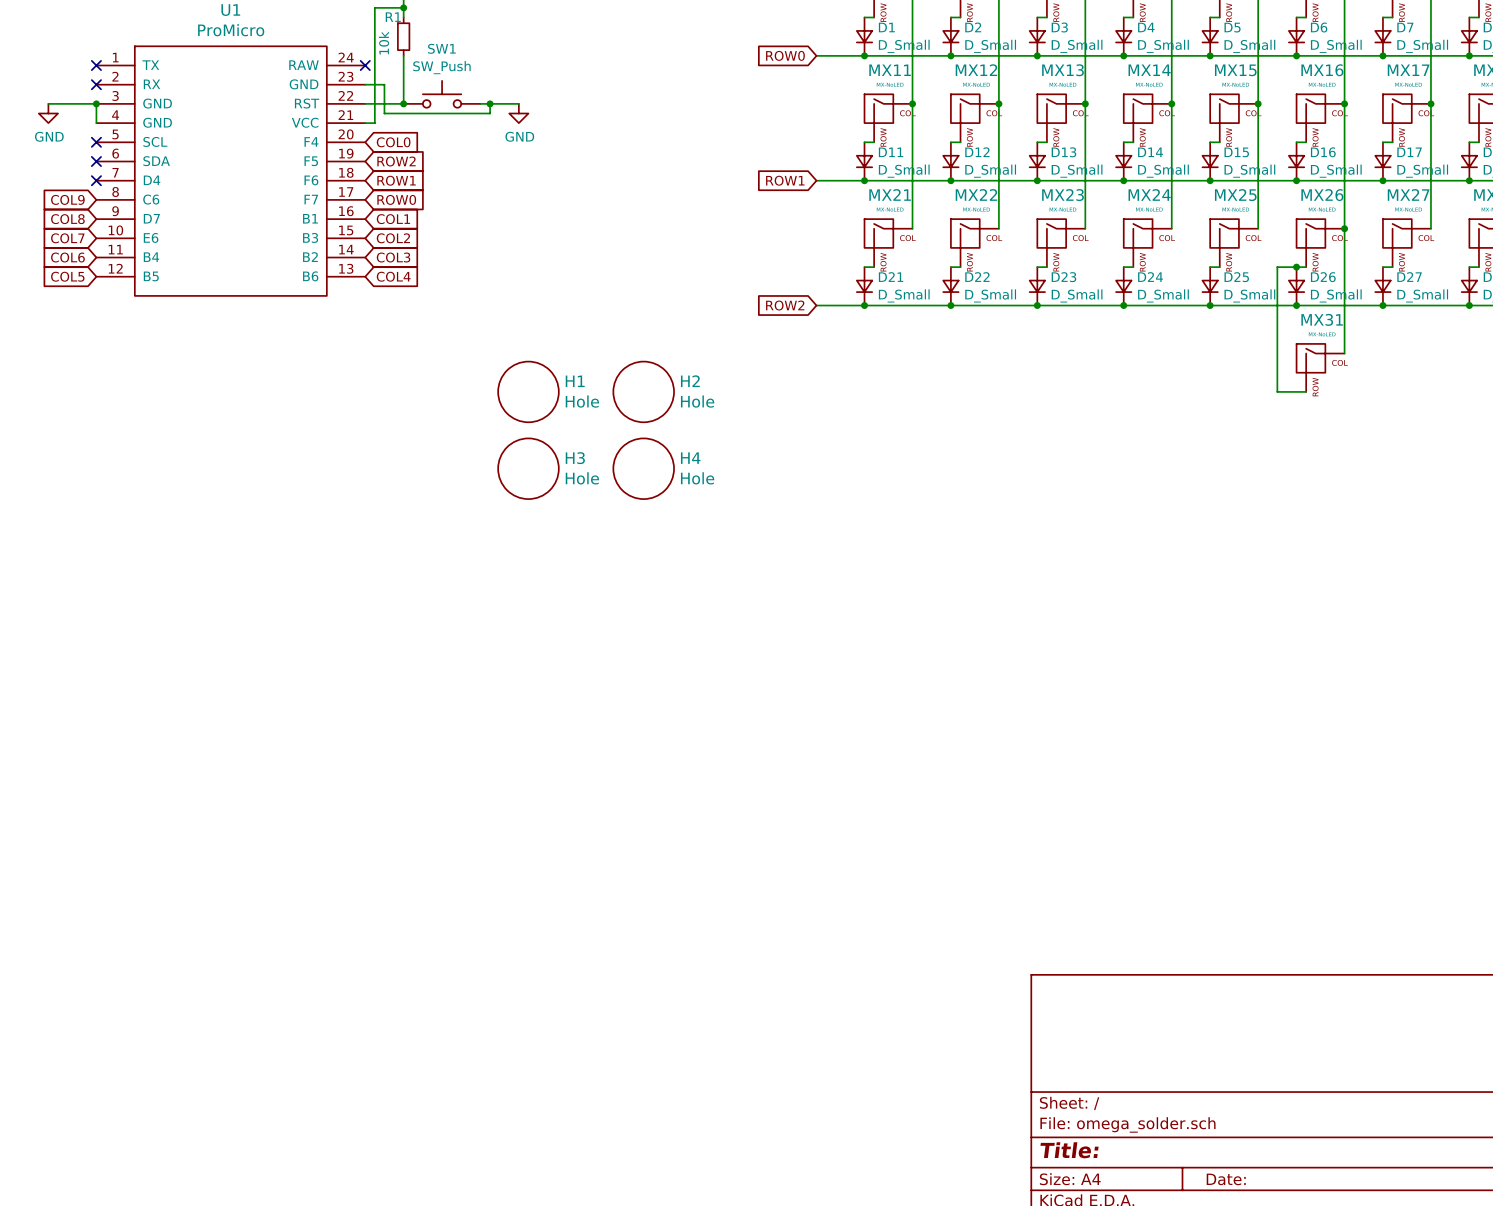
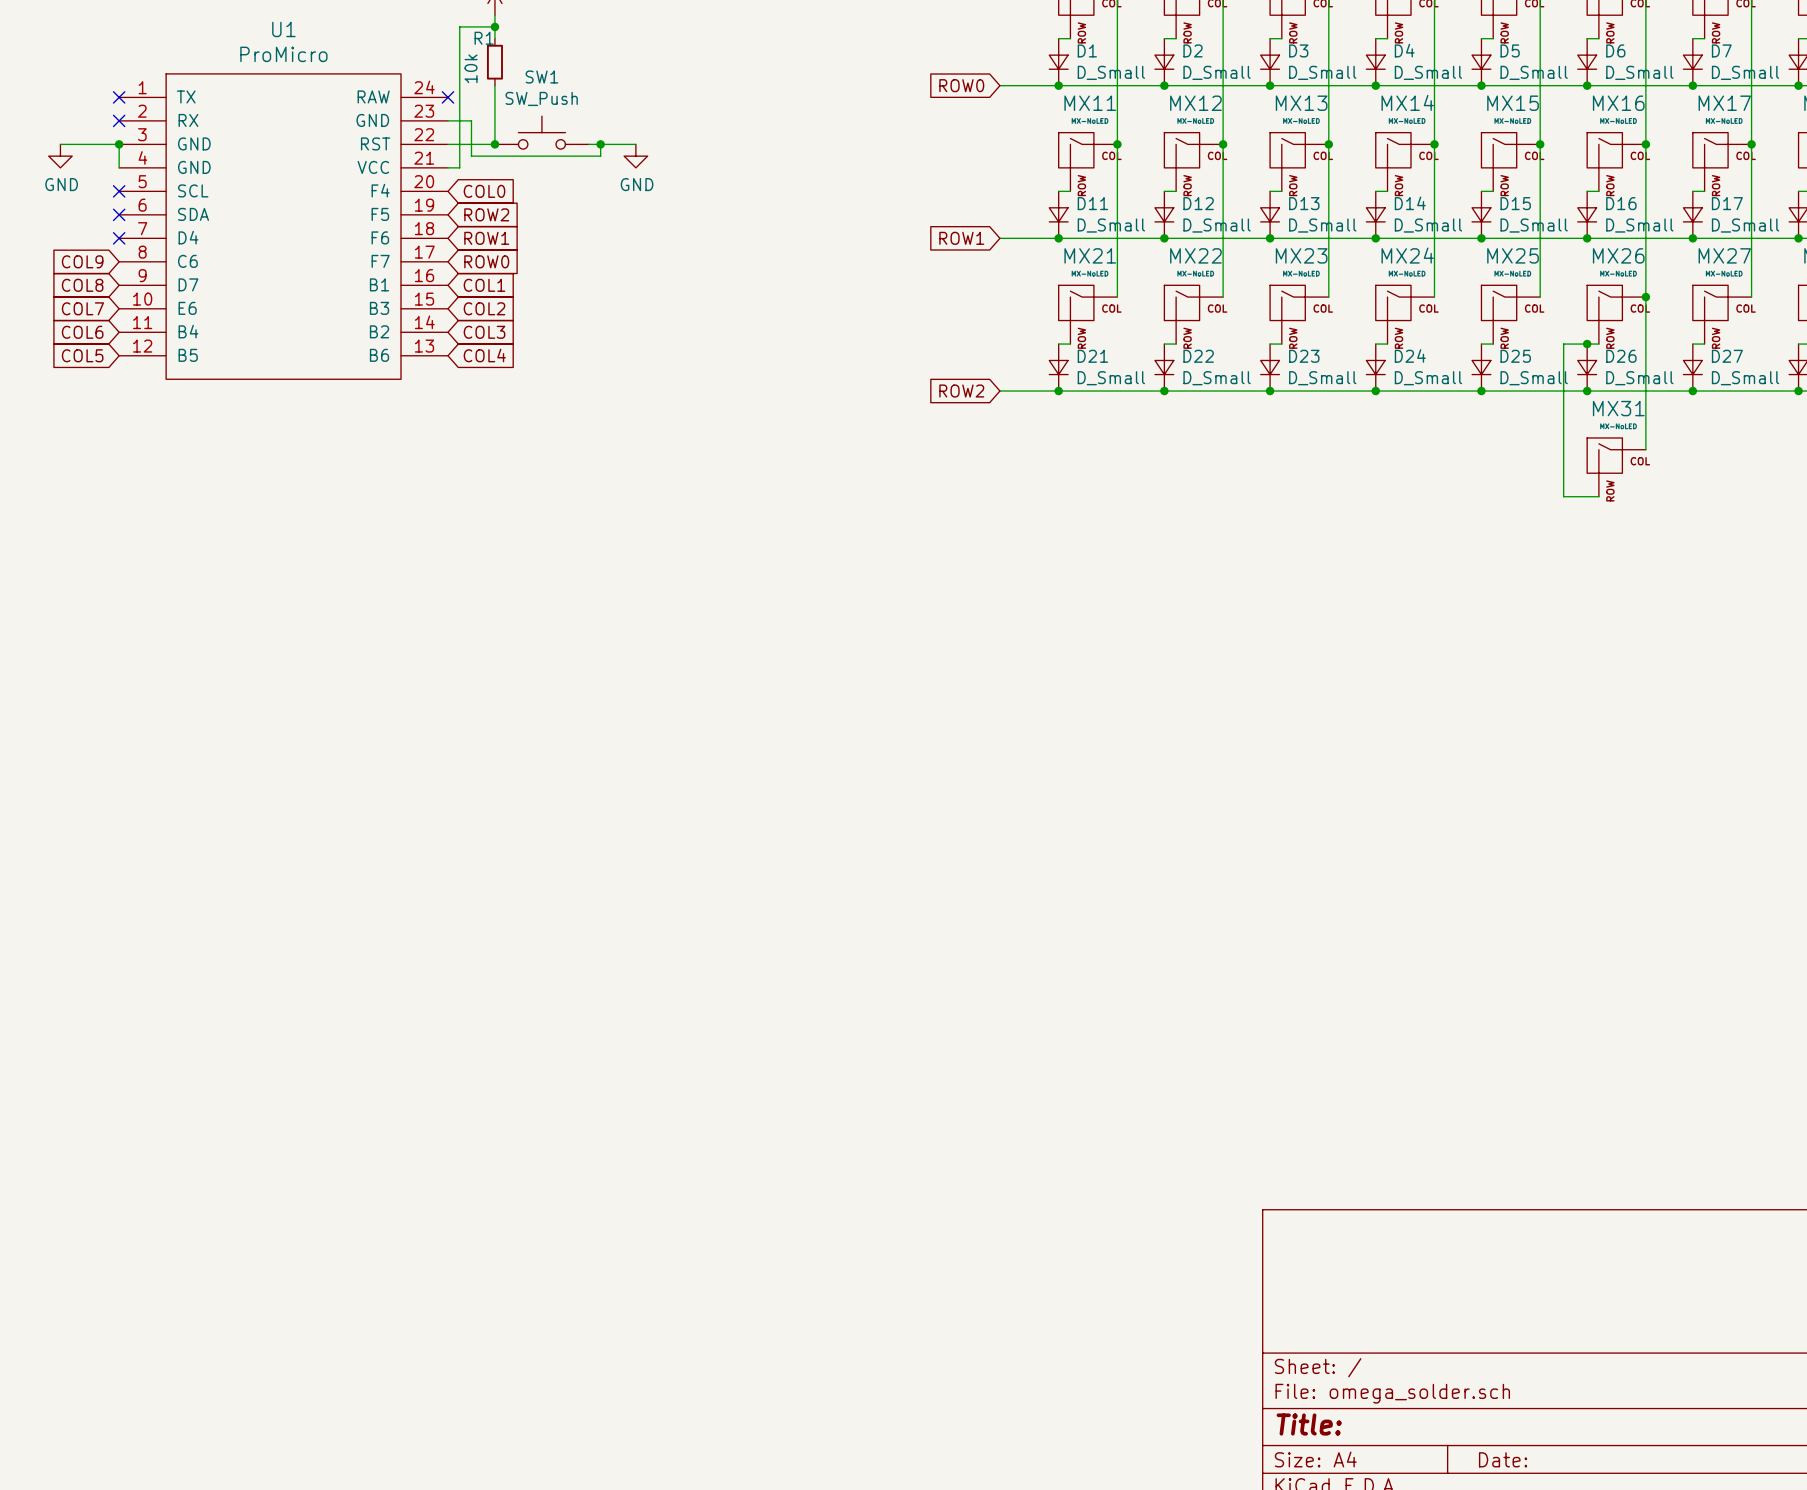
H1: Hole (528, 391) -> none
H2: Hole (643, 391) -> none
H3: Hole (528, 468) -> none
H4: Hole (643, 468) -> none

